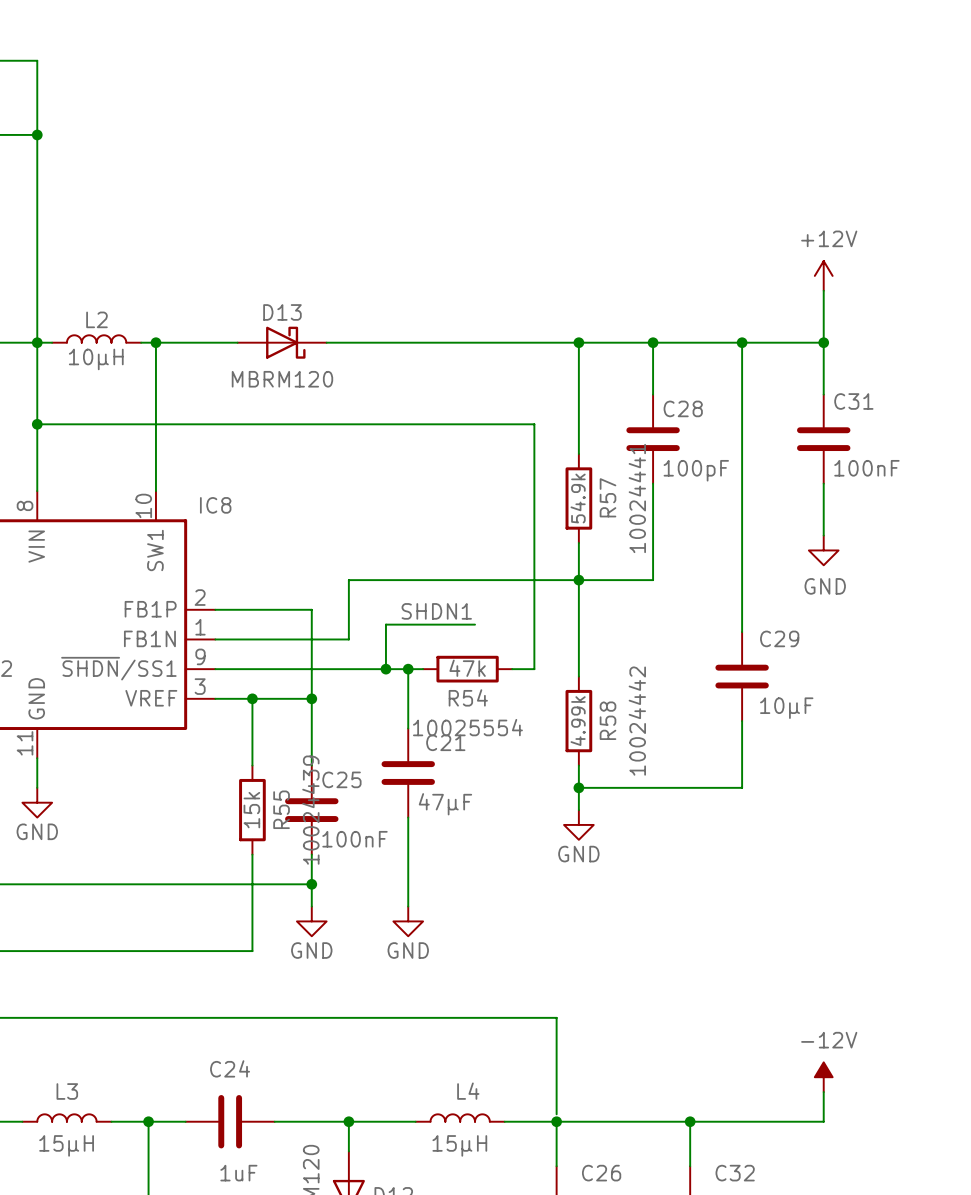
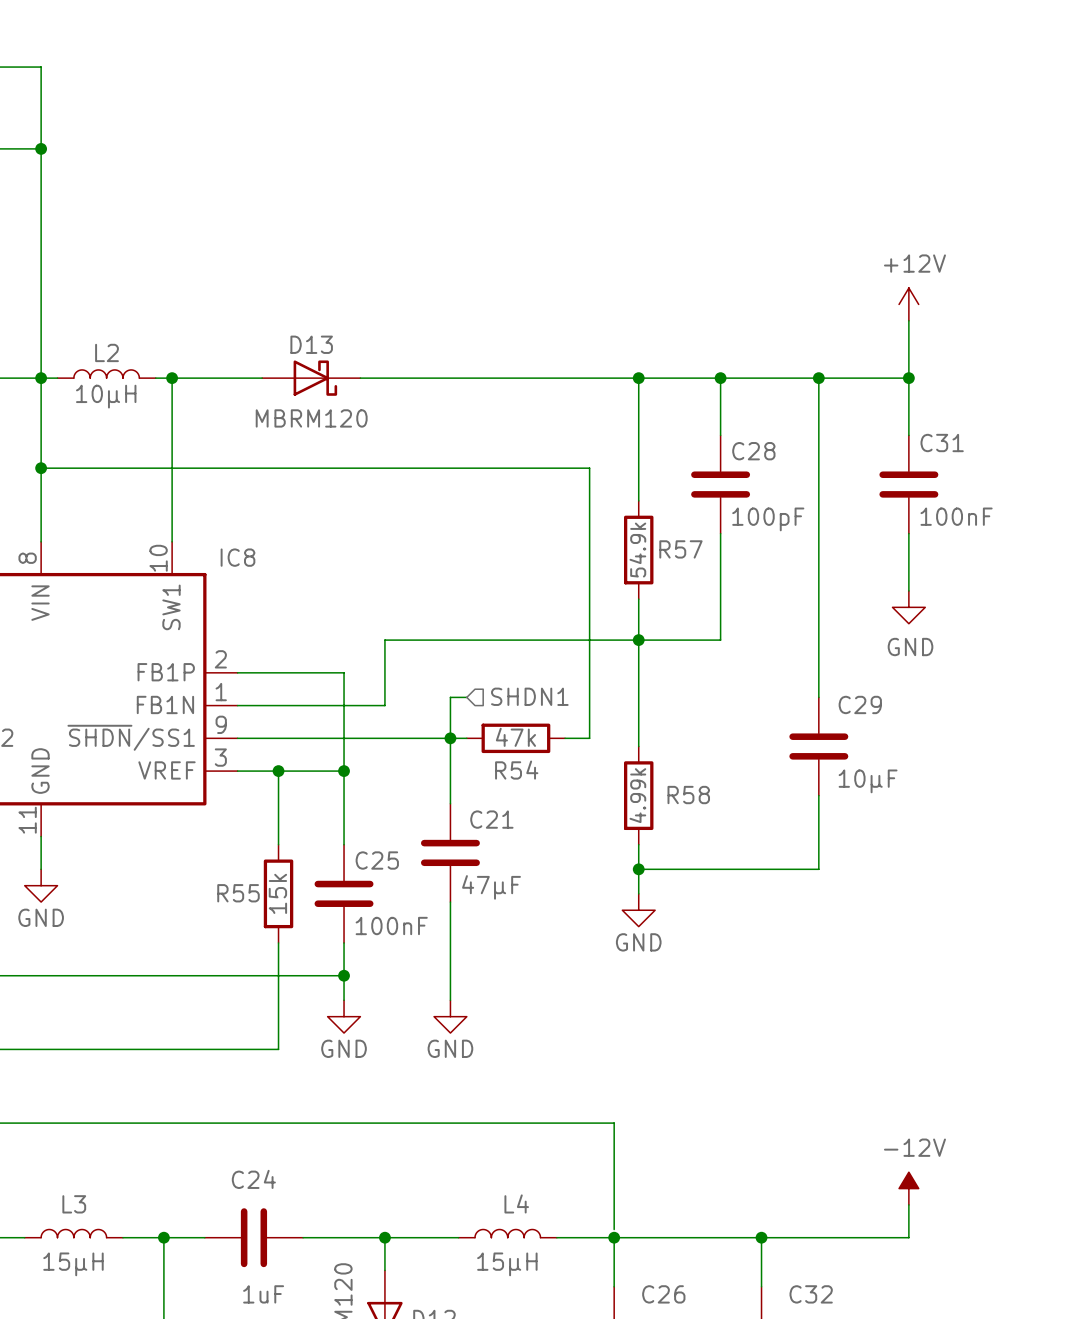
R57 name rotation: 0° (608, 497) -> 90° clockwise (680, 549)
R57 text: 10024441 (637, 498) -> none
label: SHDN1 (436, 611) -> none
wire: (475, 624) (385, 624) (385, 669) -> none
hierarchical label: none -> SHDN1 (529, 696)
wire: none -> (466, 697) (450, 697) (450, 738)
junction: (385, 669) -> none
R58 name rotation: 0° (608, 720) -> 90° clockwise (688, 795)
R58 text: 10024442 (637, 721) -> none
R54 text: 10025554 (467, 727) -> none
R55 name rotation: 0° (281, 809) -> 90° clockwise (238, 893)
R55 name position: R55 (281, 809) -> R55 (238, 893)
R55 text: 10024439 (310, 810) -> none

